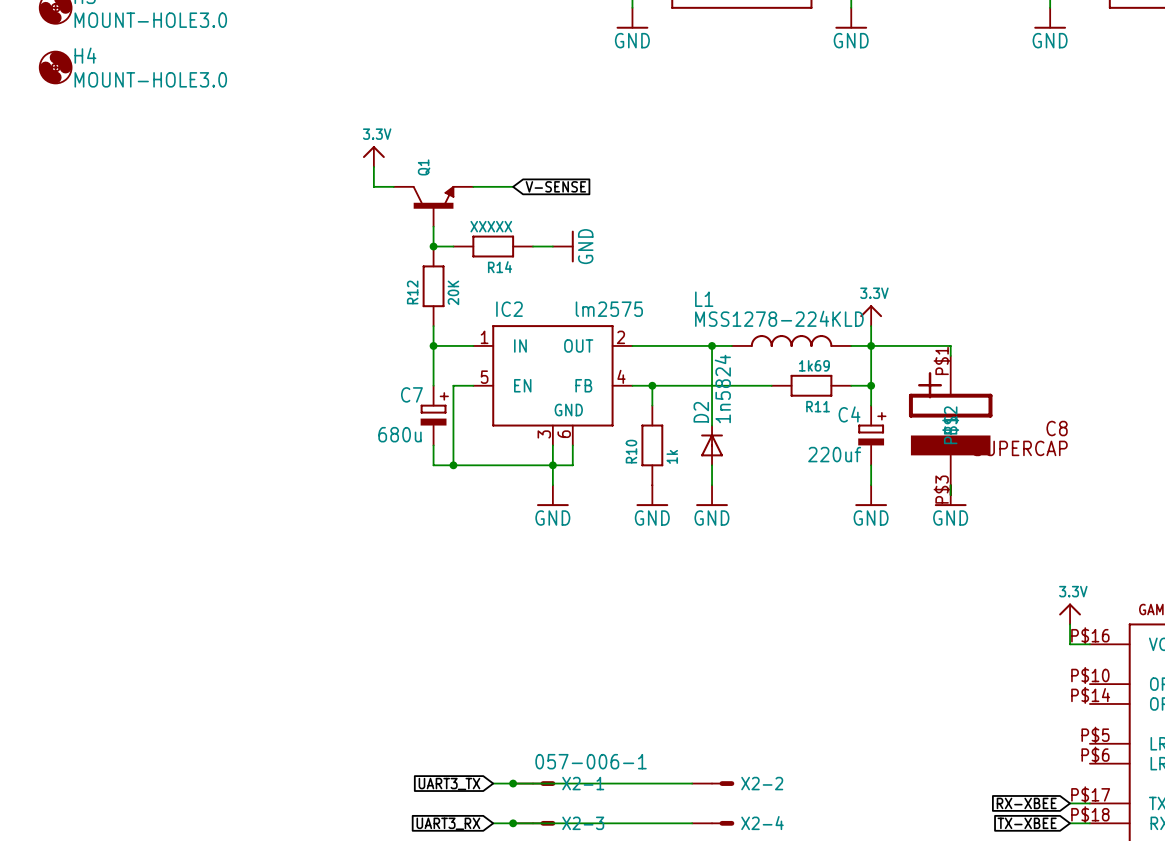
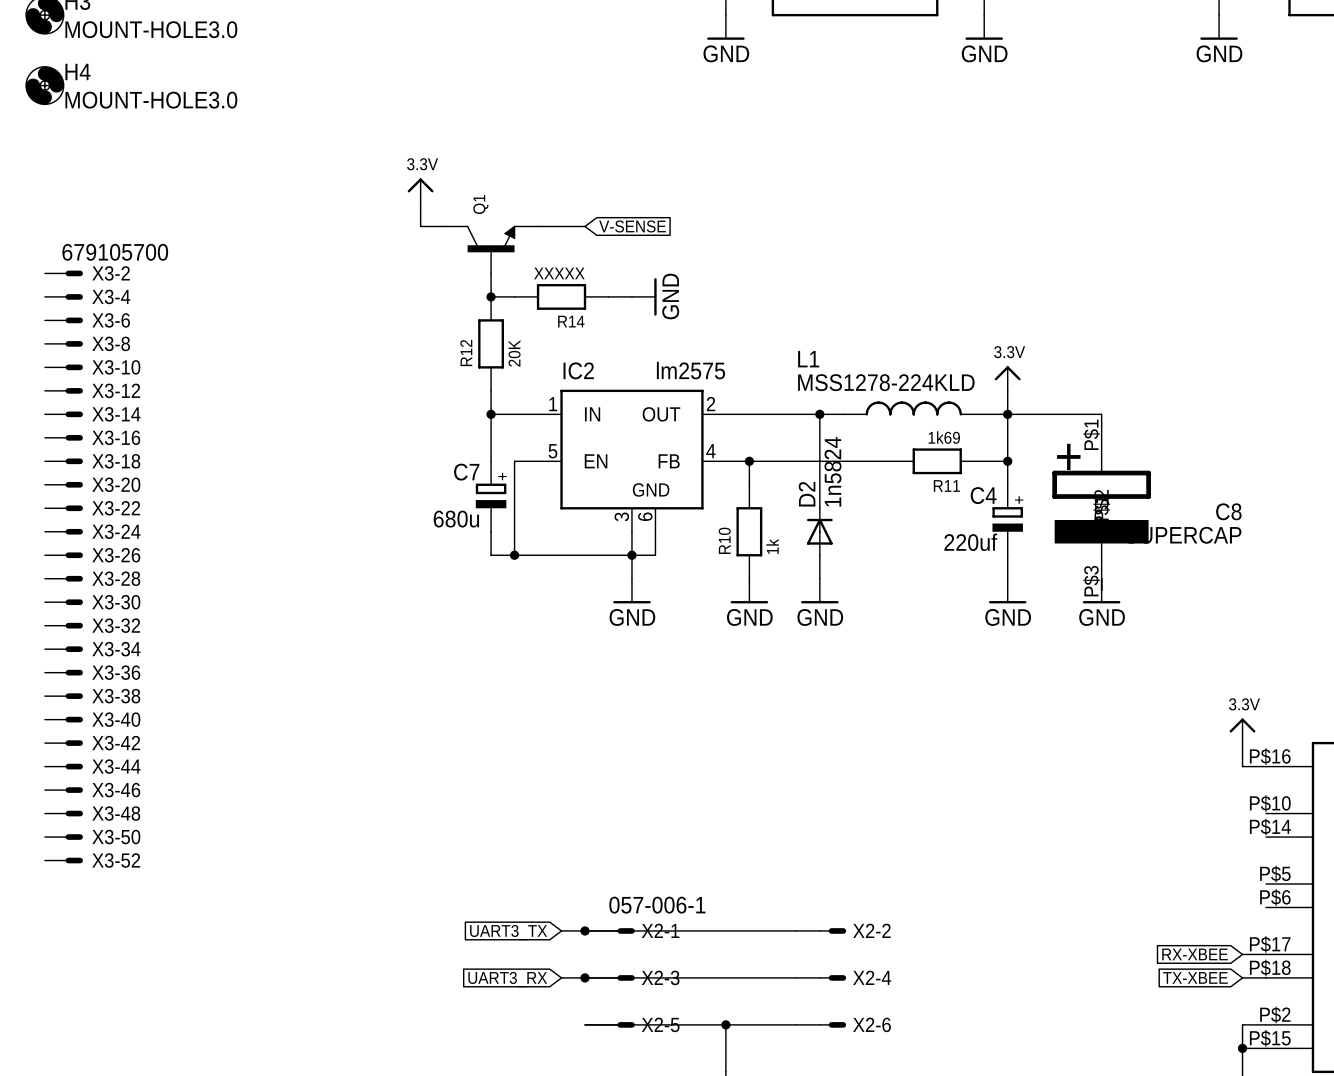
X3-2: none -> 679105700 (63, 273)
X3-4: none -> (63, 296)
X3-6: none -> (63, 320)
X3-8: none -> (63, 343)
X3-10: none -> (63, 367)
X3-12: none -> (63, 390)
X3-14: none -> (63, 414)
X3-16: none -> (63, 437)
X3-18: none -> (63, 461)
X3-20: none -> (63, 484)
X3-22: none -> (63, 508)
X3-24: none -> (63, 531)
X3-26: none -> (63, 555)
X3-28: none -> (63, 578)
X3-30: none -> (63, 602)
X3-32: none -> (63, 625)
X3-34: none -> (63, 649)
X3-36: none -> (63, 672)
X3-38: none -> (63, 696)
X3-40: none -> (63, 719)
X3-42: none -> (63, 743)
X3-44: none -> (63, 766)
X3-46: none -> (63, 790)
X3-48: none -> (63, 813)
X3-50: none -> (63, 837)
X3-52: none -> (63, 860)

